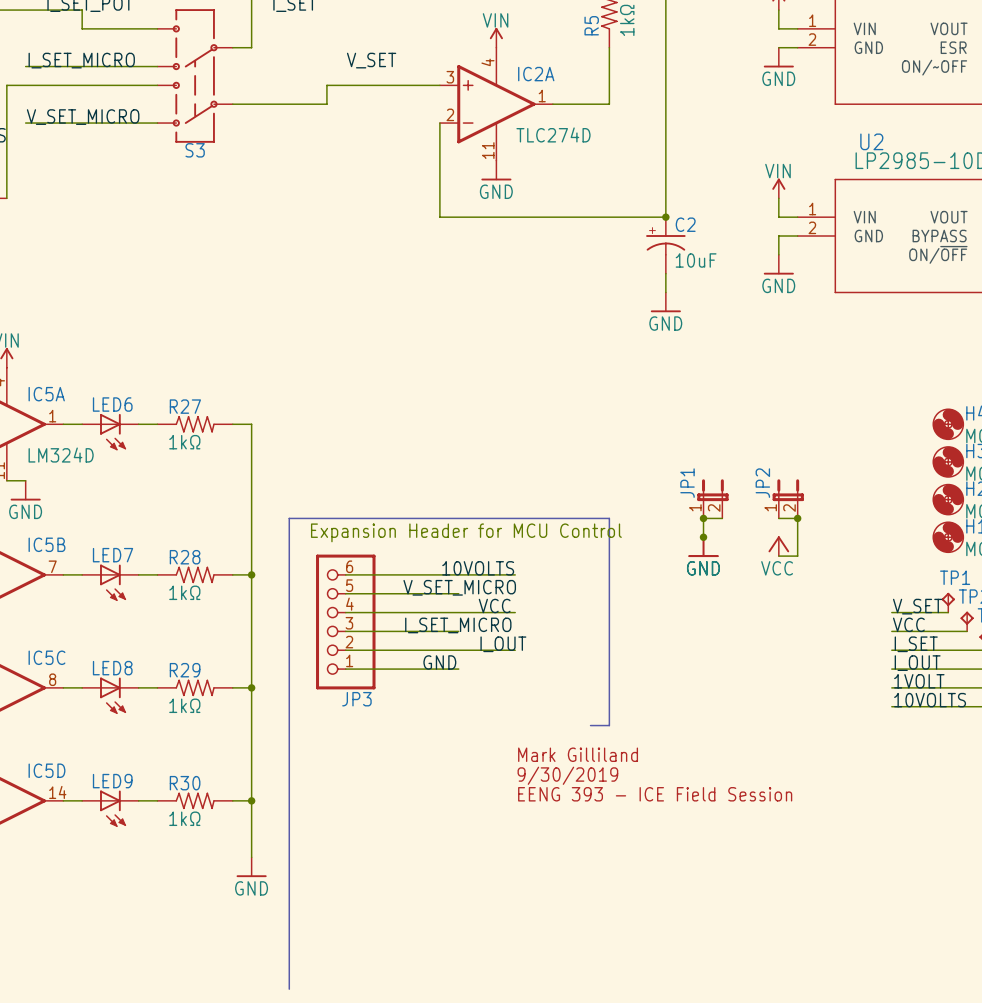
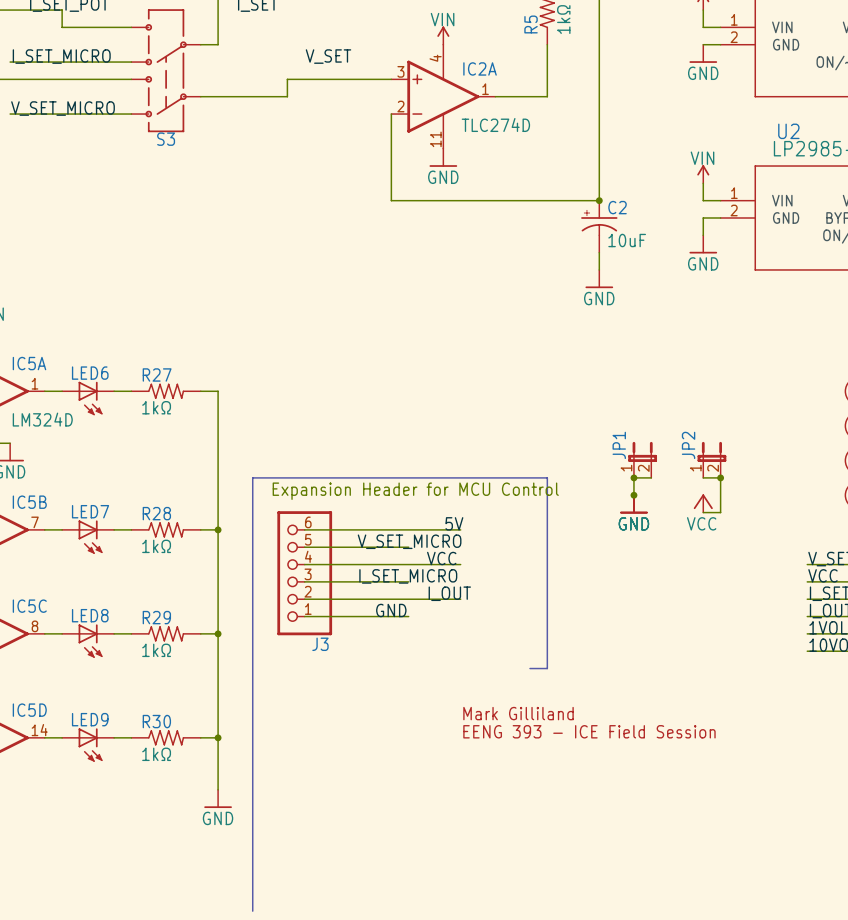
label: 10VOLTS (478, 568) -> none
label: none -> 5V (454, 523)
JP3 name: JP3 (356, 699) -> J3 (320, 644)
text: Mark Gilliland (578, 754) -> none
text: 9/30/2019 (567, 775) -> Mark Gilliland (518, 713)

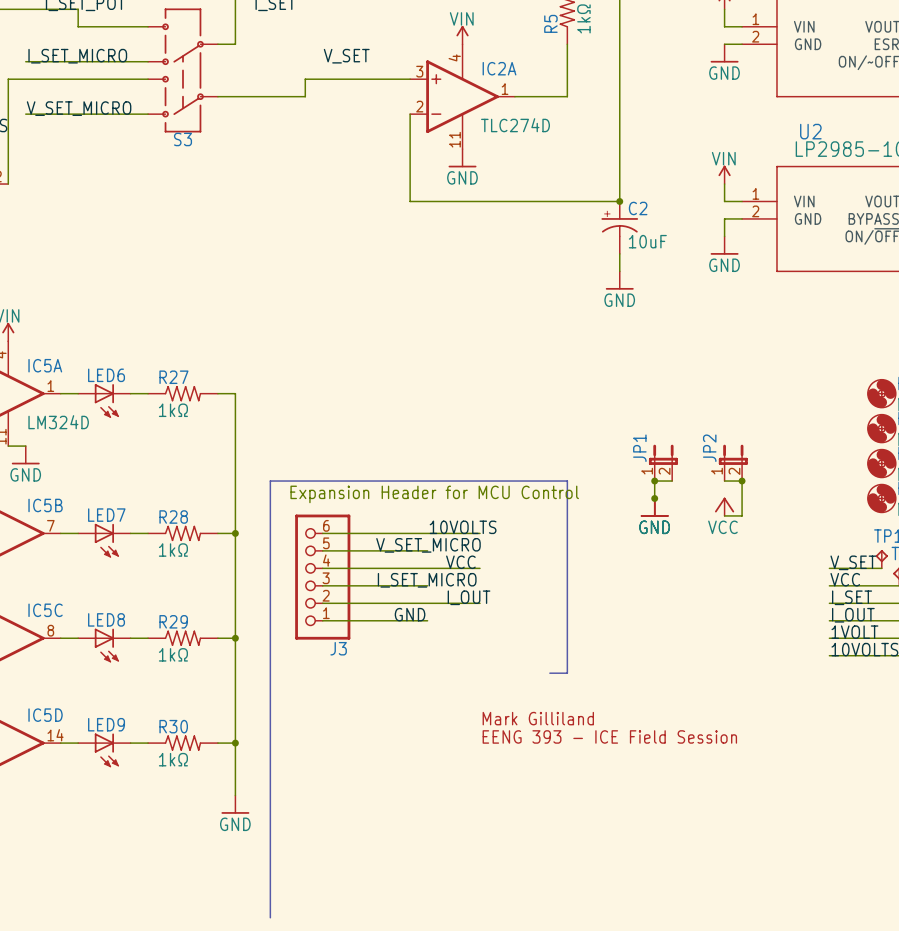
label: none -> 10VOLTS (463, 527)
label: 5V (454, 523) -> none

